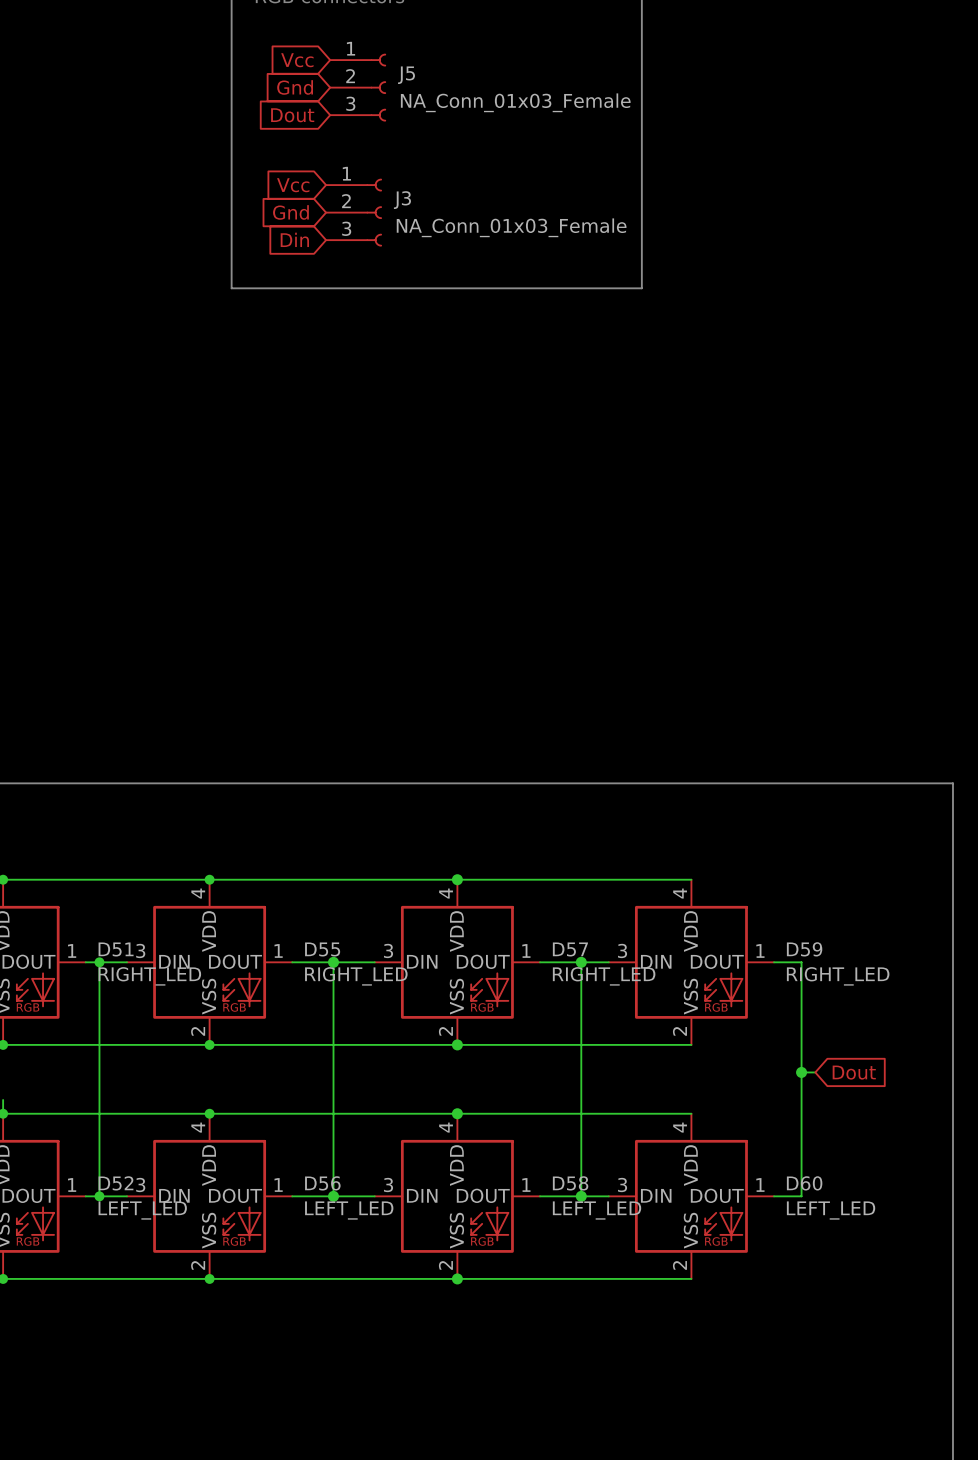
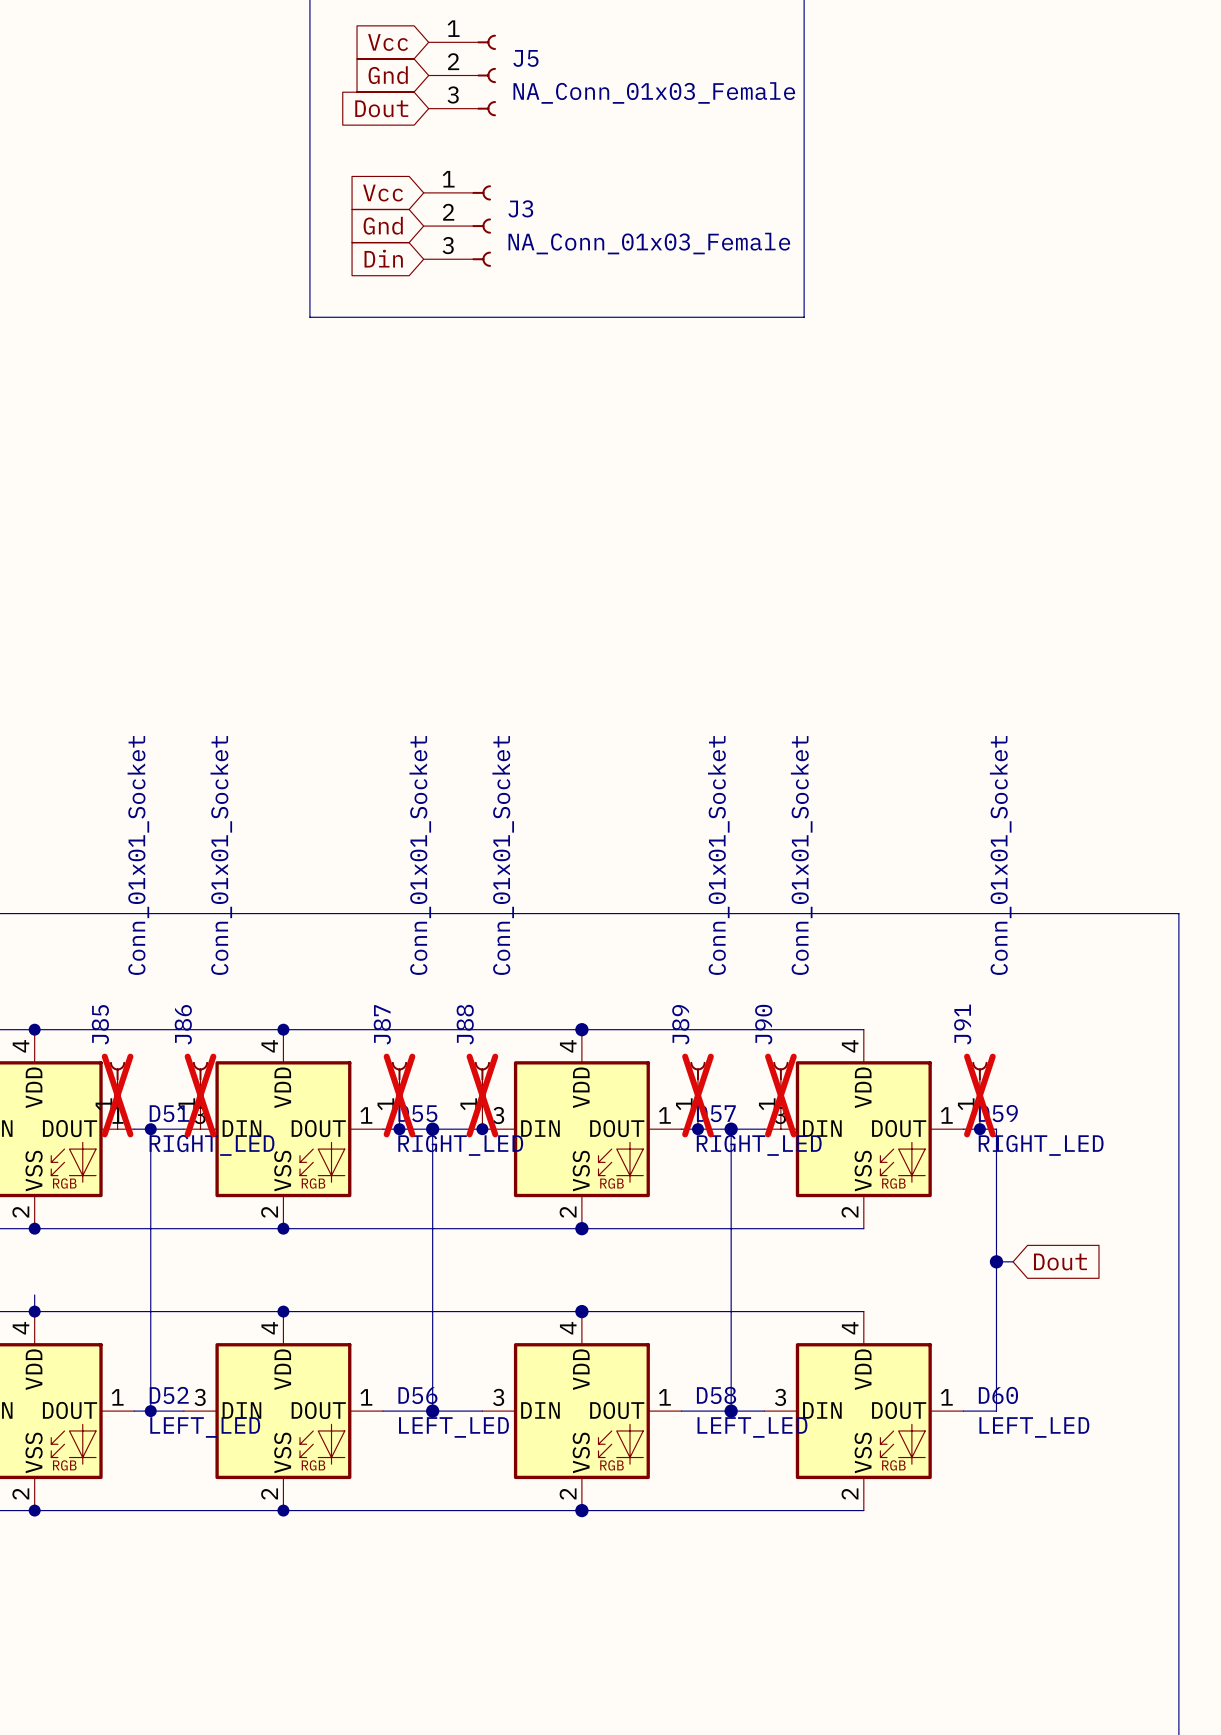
J85: none -> Conn_01x01_Socket (117, 1095)
J86: none -> Conn_01x01_Socket (200, 1095)
J87: none -> Conn_01x01_Socket (399, 1095)
J88: none -> Conn_01x01_Socket (482, 1095)
J89: none -> Conn_01x01_Socket (697, 1095)
J90: none -> Conn_01x01_Socket (780, 1095)
J91: none -> Conn_01x01_Socket (979, 1095)
junction: none -> (399, 1129)
junction: none -> (482, 1129)
junction: none -> (697, 1129)
junction: none -> (979, 1129)

